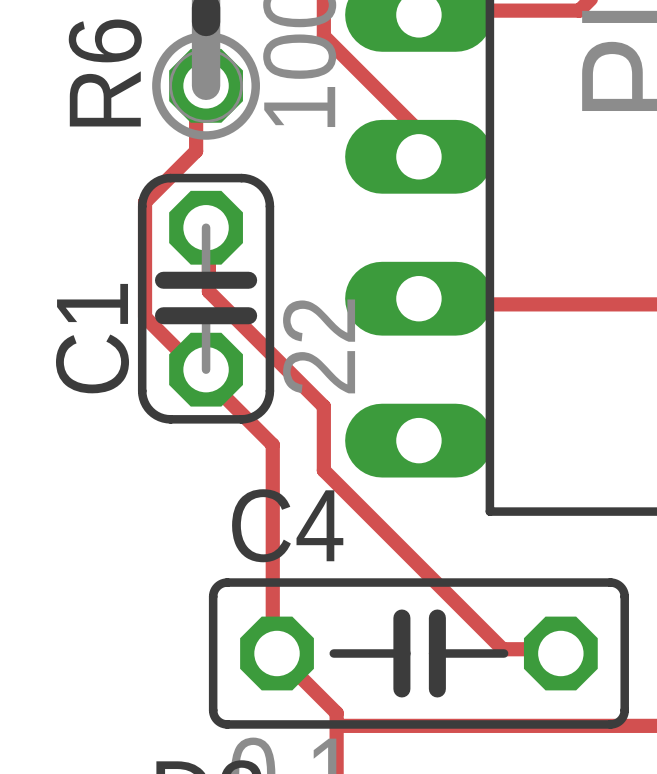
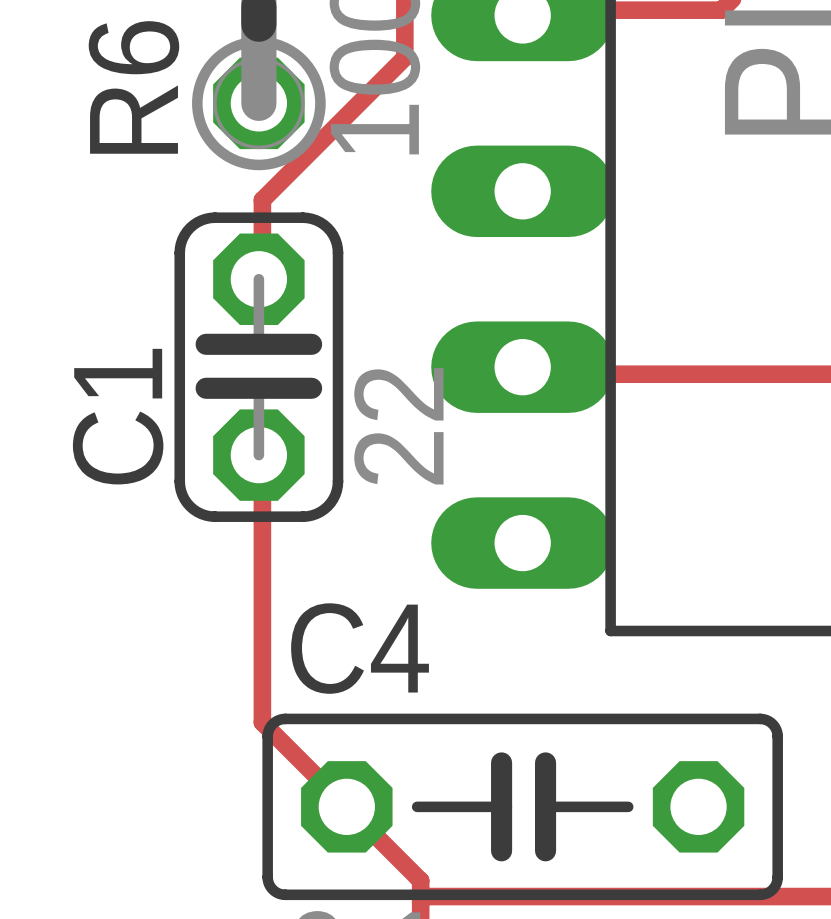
track: (323, 36) (413, 125) (413, 151) (418, 156) -> (404, 41) (404, 57) (262, 200) (262, 279)
track: (206, 85) (196, 87) (196, 151) (145, 202) (145, 317) (196, 368) (206, 369) -> none
track: (208, 227) (208, 291) (323, 406) (323, 470) (502, 649) (553, 649) (560, 653) -> none
track: (208, 381) (272, 444) (272, 649) -> (262, 469) (262, 722) (341, 801)

